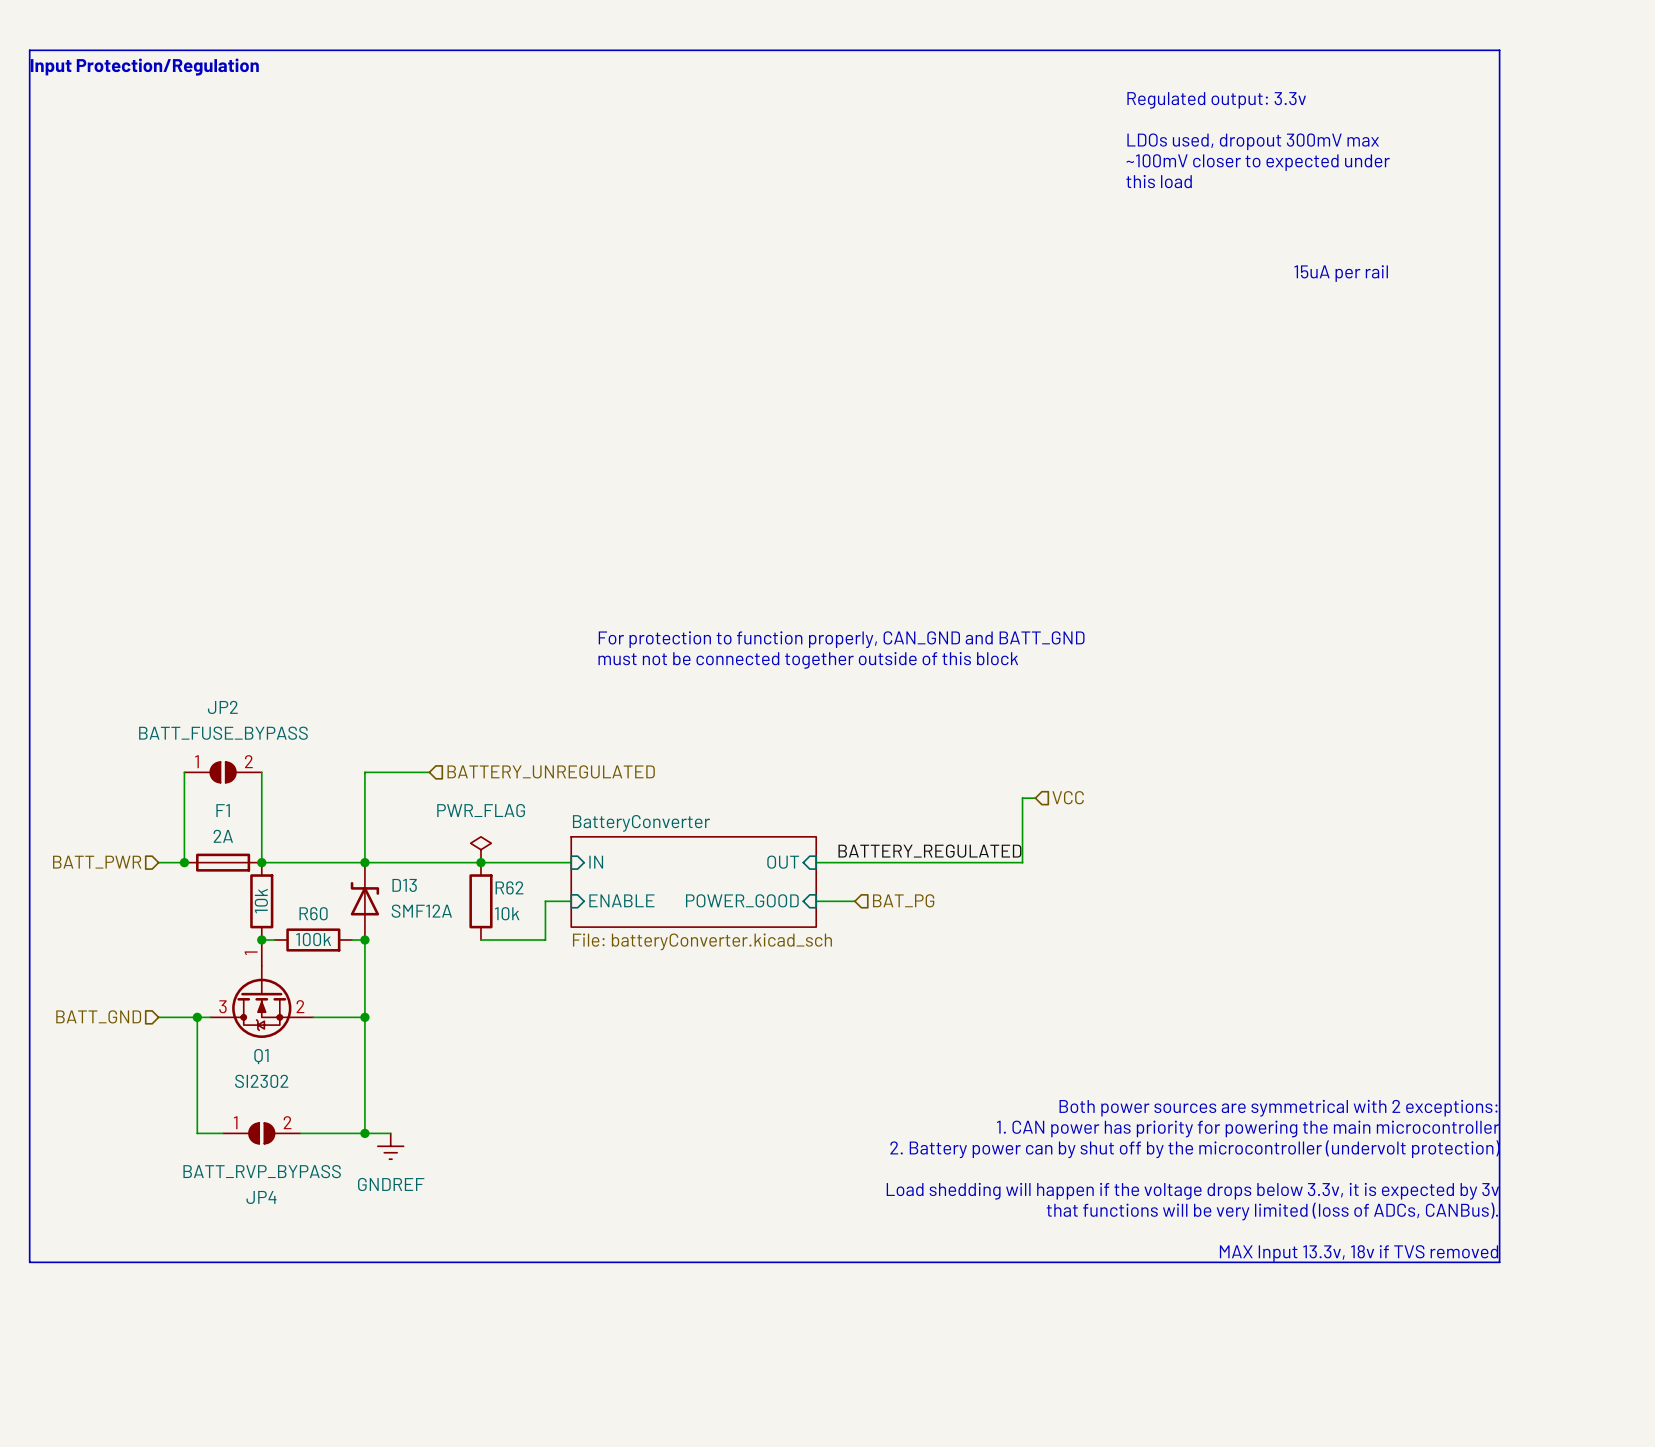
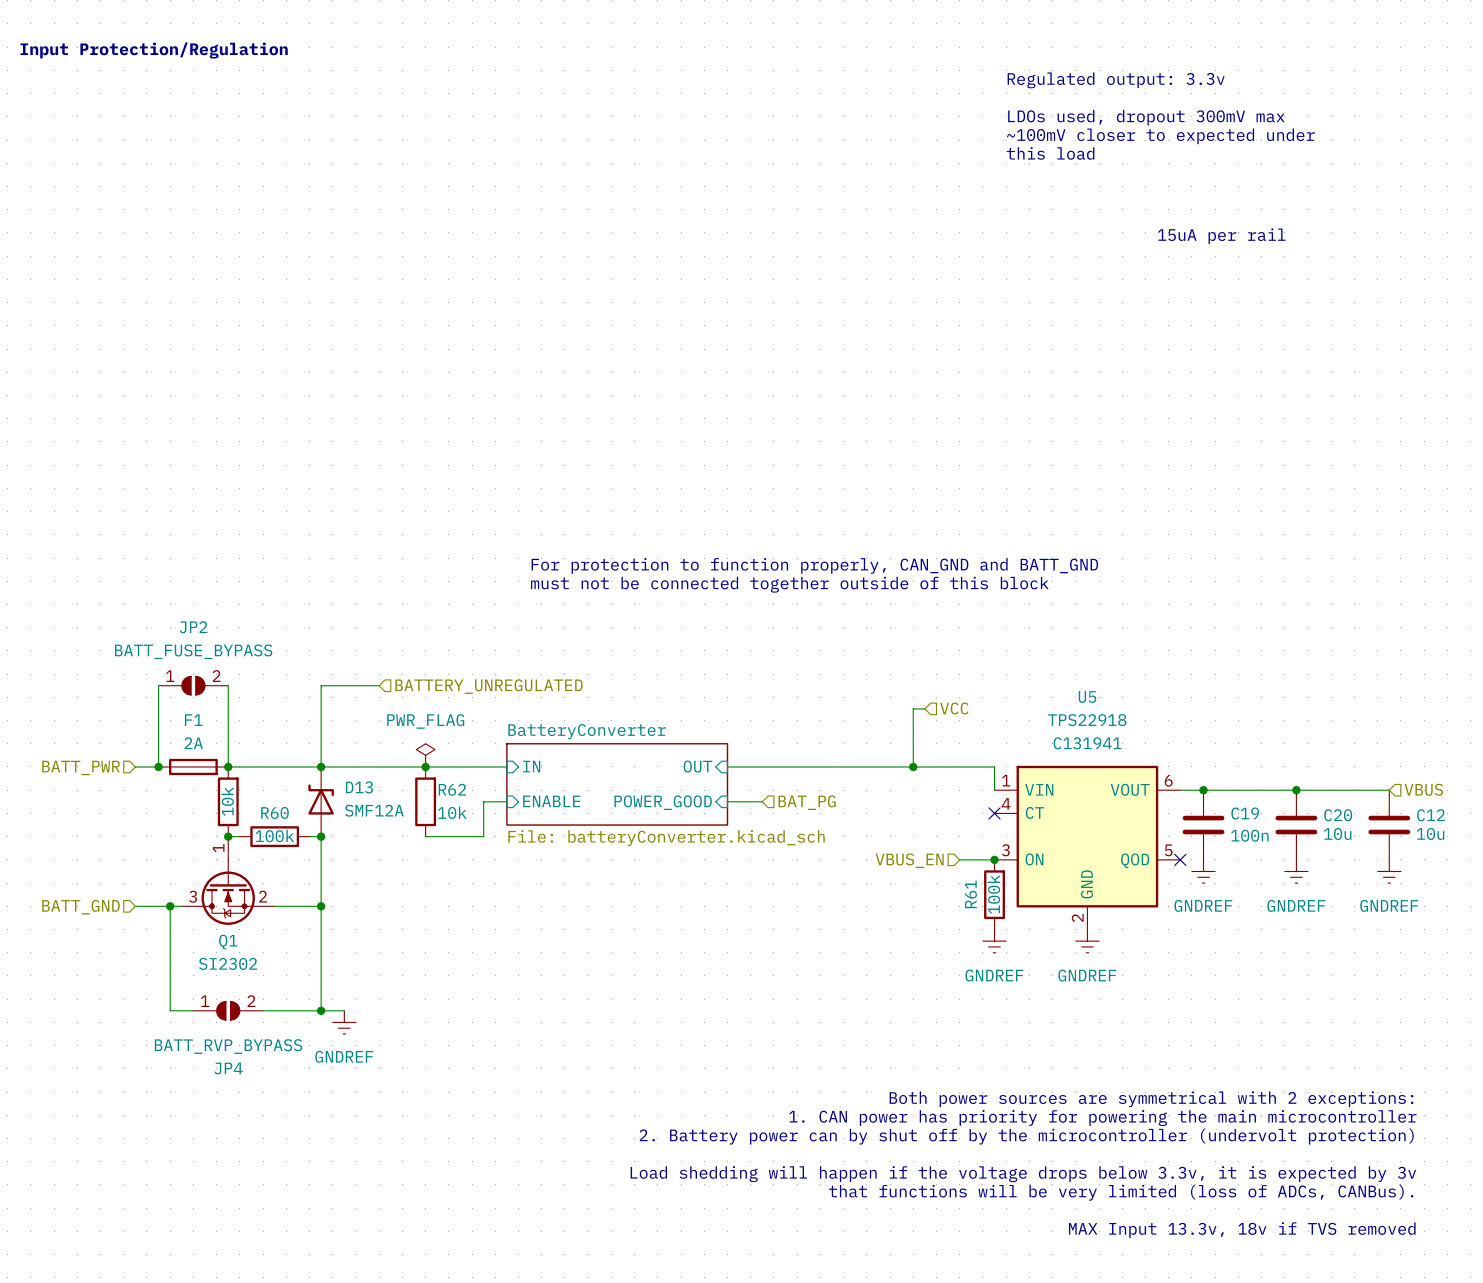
line: (29, 50) (1499, 50) (1499, 1262) (29, 1262) (29, 50) -> none
label: BATTERY_REGULATED (929, 851) -> none
wire: none -> (913, 766) (994, 766) (994, 790)
junction: none -> (913, 766)
hierarchical label: none -> VBUS (1423, 789)
wire: none -> (1180, 790) (1389, 790)
junction: none -> (1203, 790)
junction: none -> (1296, 790)
no-connect mark: none -> (994, 813)
C19: none -> 100n (1203, 825)
C20: none -> 10u (1296, 825)
C12: none -> 10u (1389, 825)
U5: none -> TPS22918 (1087, 847)
hierarchical label: none -> VBUS_EN (909, 860)
wire: none -> (959, 859) (994, 859)
junction: none -> (994, 859)
no-connect mark: none -> (1180, 859)
power symbol: none -> GNDREF (1203, 871)
power symbol: none -> GNDREF (1296, 871)
power symbol: none -> GNDREF (1389, 871)
R61: none -> 100k (994, 894)
power symbol: none -> GNDREF (994, 941)
power symbol: none -> GNDREF (1087, 941)
text position: Both power sources are symmetrical with 2 exceptions: (1278, 1108) -> Both power sources are symmetrical with 2 exceptions: (1151, 1099)
text position: 1. CAN power has priority for powering the main microcontroller (1248, 1128) -> 1. CAN power has priority for powering the main microcontroller (1102, 1118)
text position: 2. Battery power can by shut off by the microcontroller (undervolt protection) (1195, 1149) -> 2. Battery power can by shut off by the microcontroller (undervolt protection) (1026, 1136)
text position: Load shedding will happen if the voltage drops below 3.3v, it is expected by 3v (1192, 1191) -> Load shedding will happen if the voltage drops below 3.3v, it is expected by 3v (1023, 1174)
text position: that functions will be very limited (loss of ADCs, CANBus). (1272, 1211) -> that functions will be very limited (loss of ADCs, CANBus). (1121, 1192)
text position: MAX Input 13.3v, 18v if TVS removed (1358, 1253) -> MAX Input 13.3v, 18v if TVS removed (1242, 1230)

